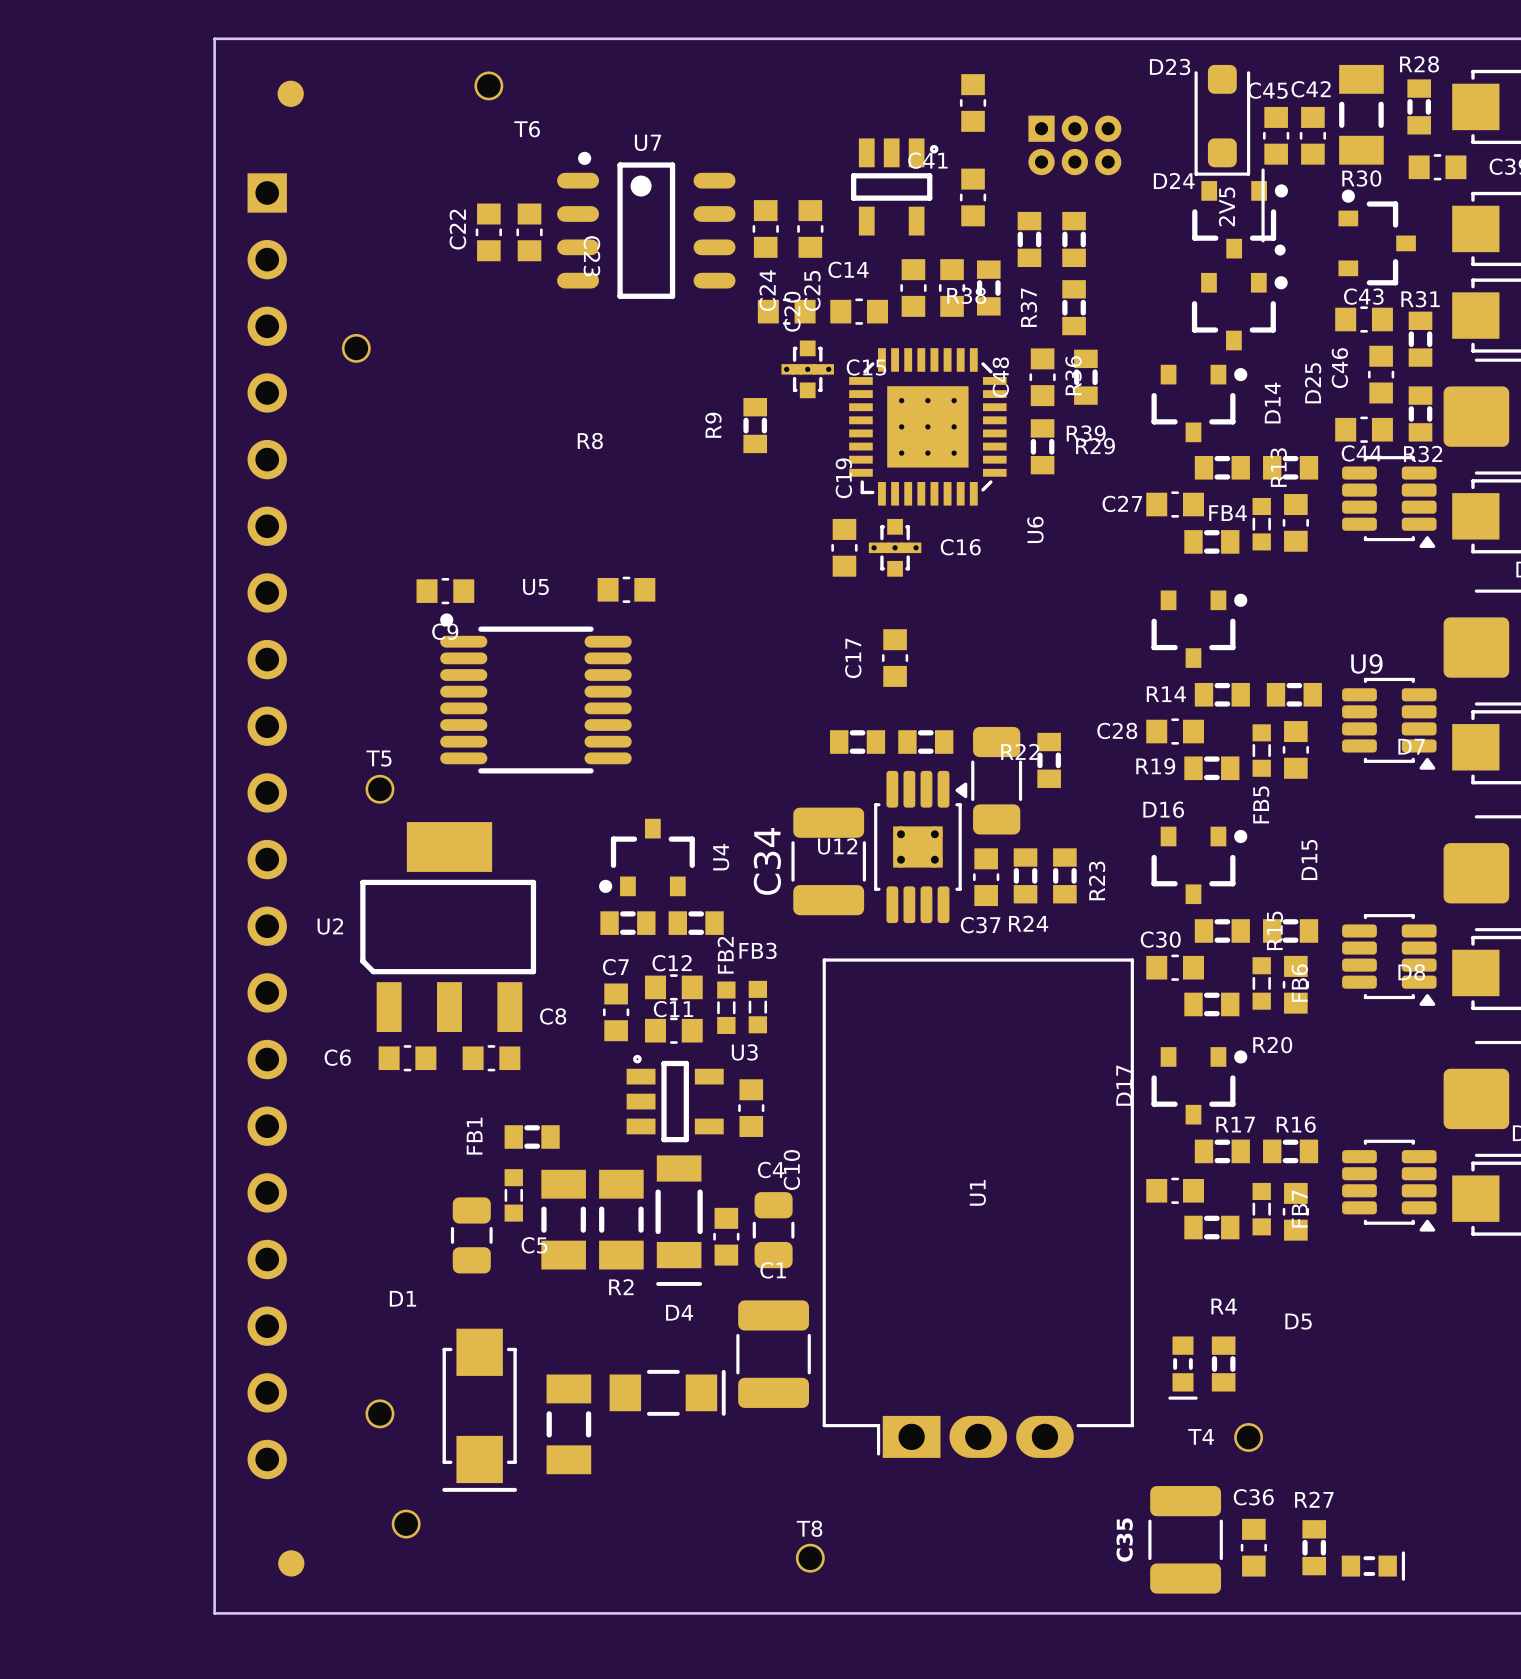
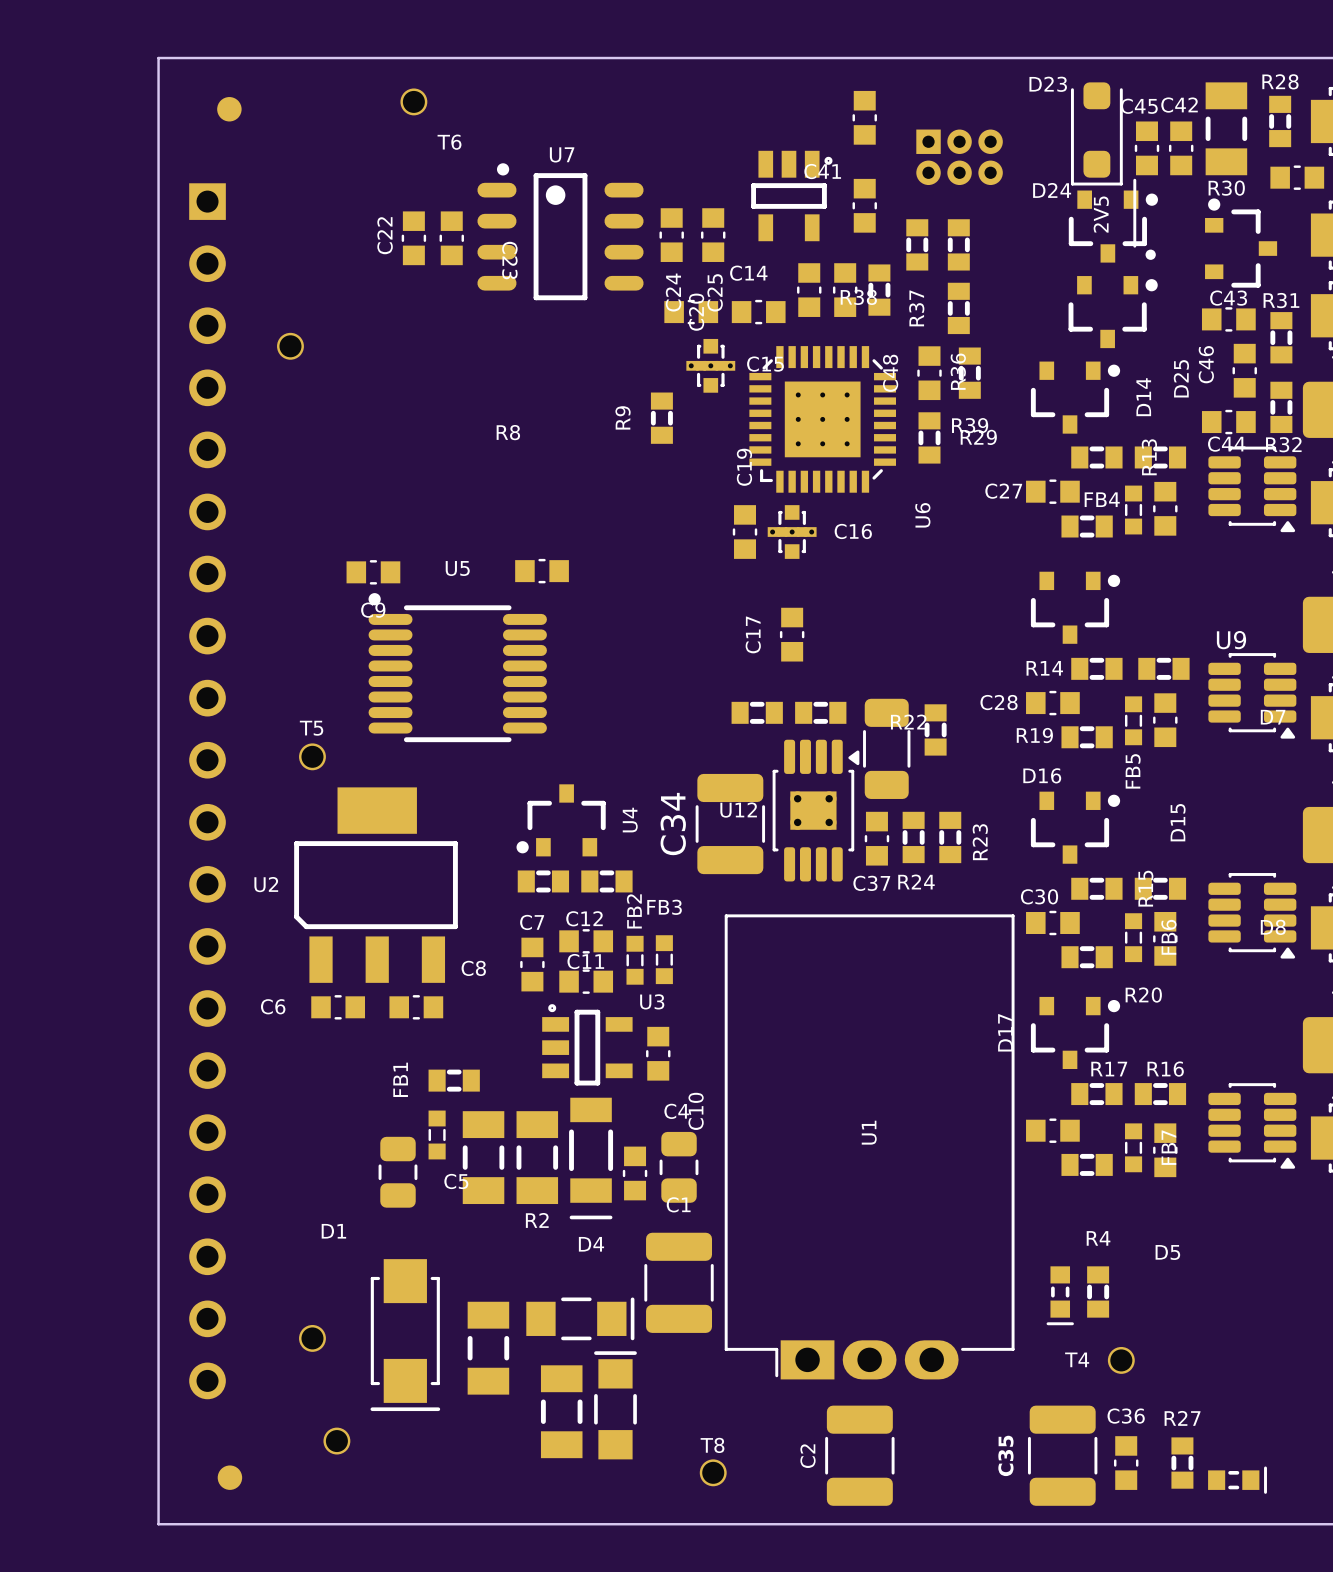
part: none -> (615, 1405)
part: none -> (561, 1411)
C2: none -> (859, 1455)

